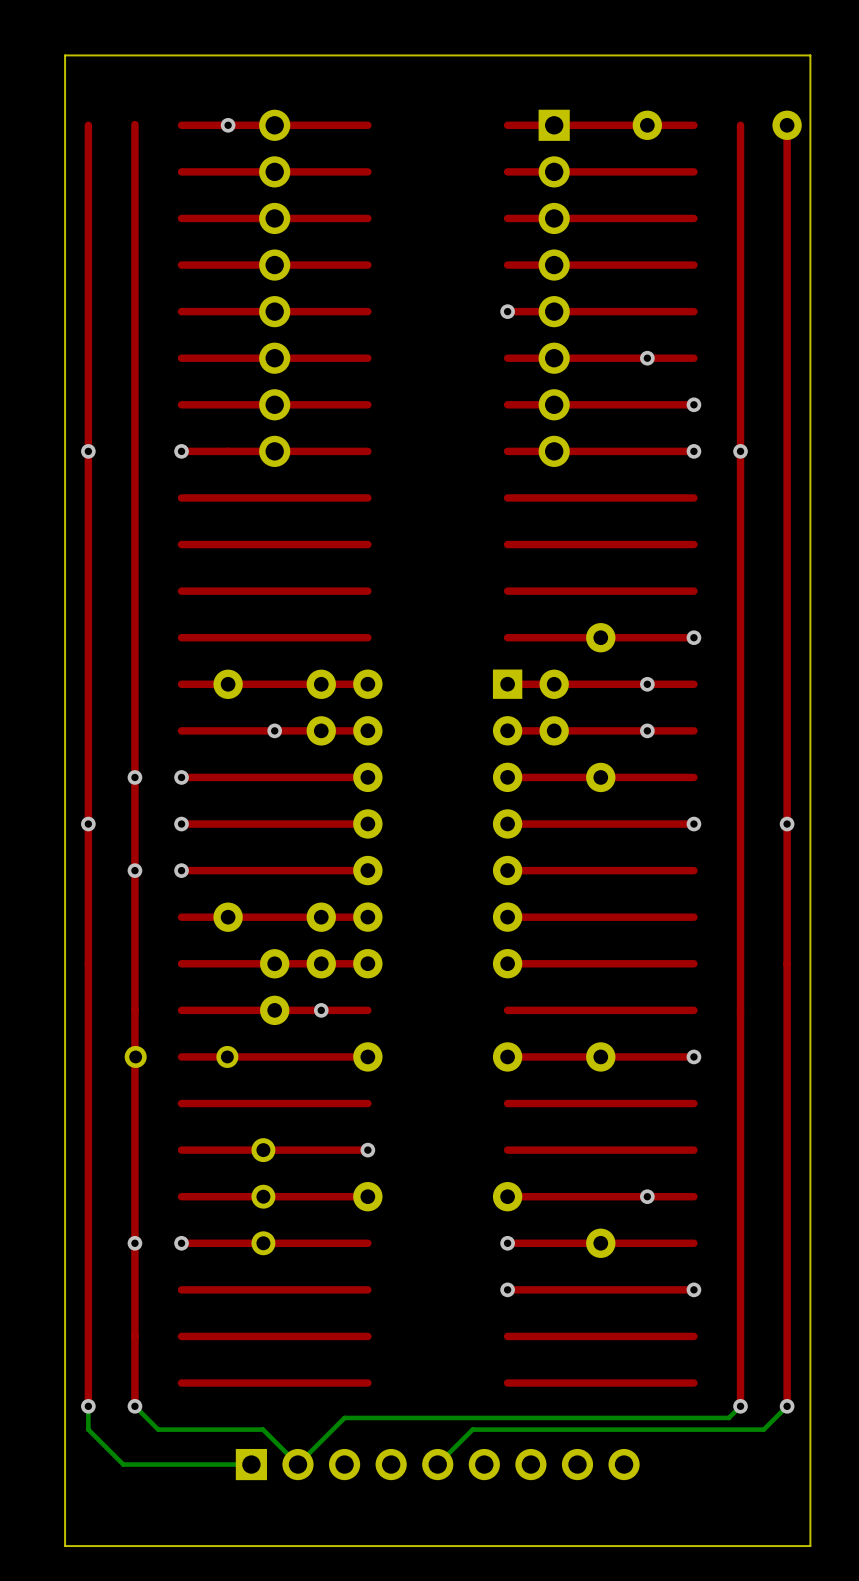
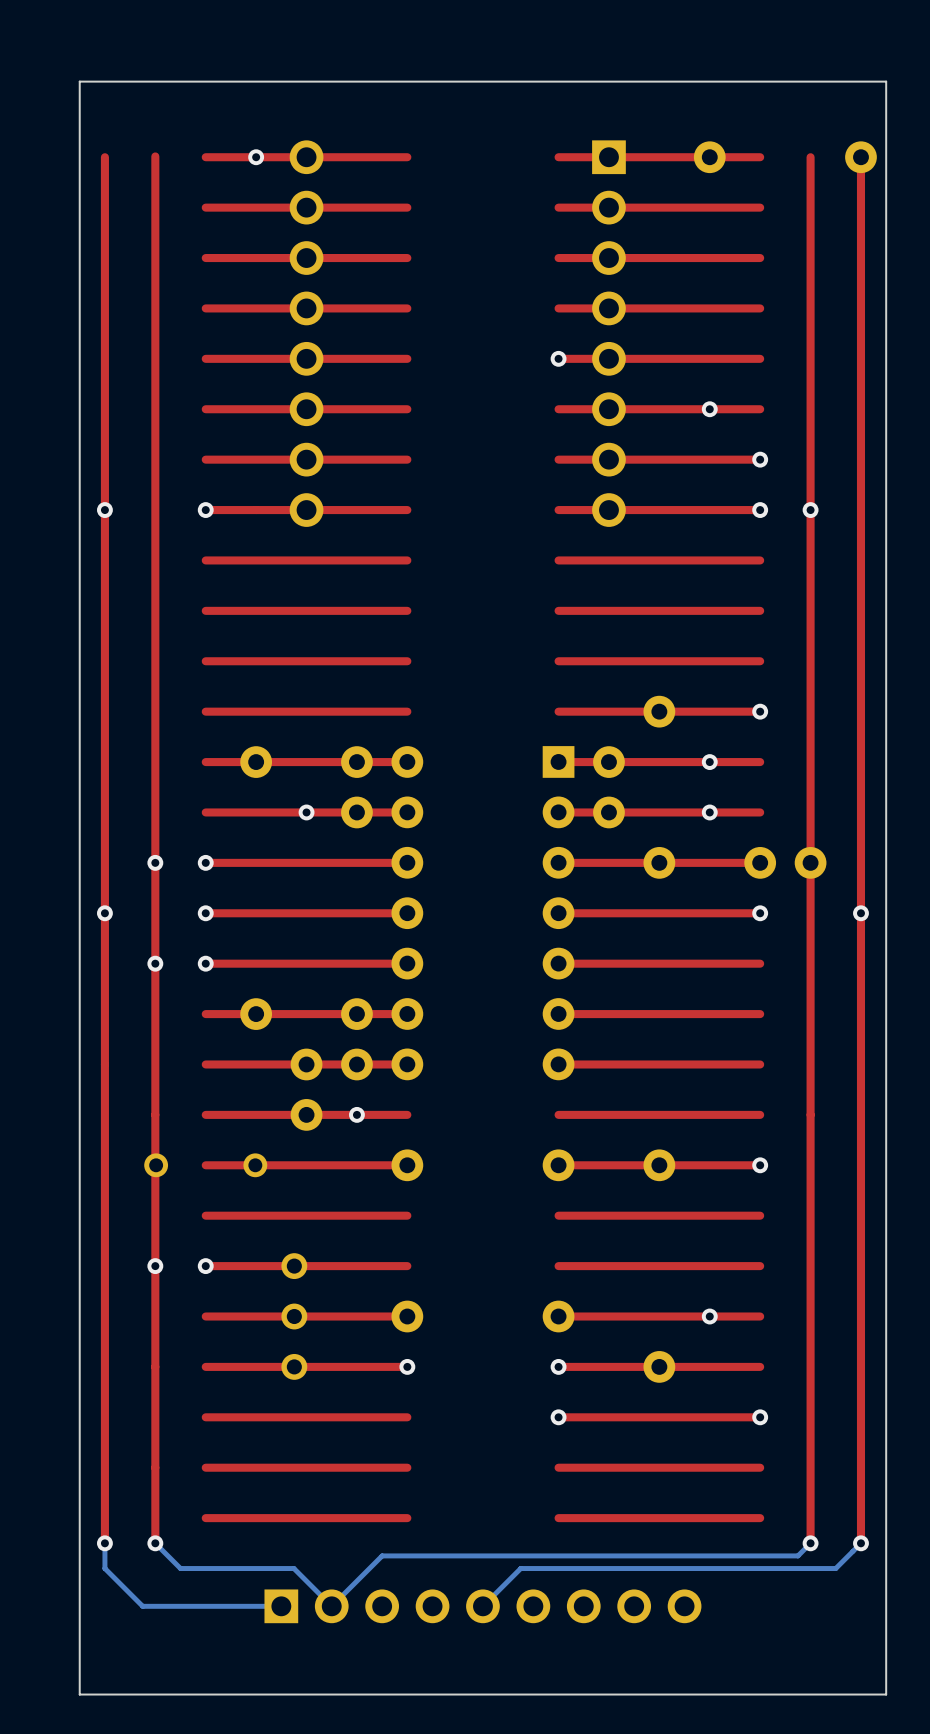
part: none -> (785, 862)
via: none -> (155, 1266)
via: none -> (205, 1266)
via: (367, 1150) -> none
via: (134, 1243) -> none
via: (181, 1243) -> none
via: none -> (407, 1366)

